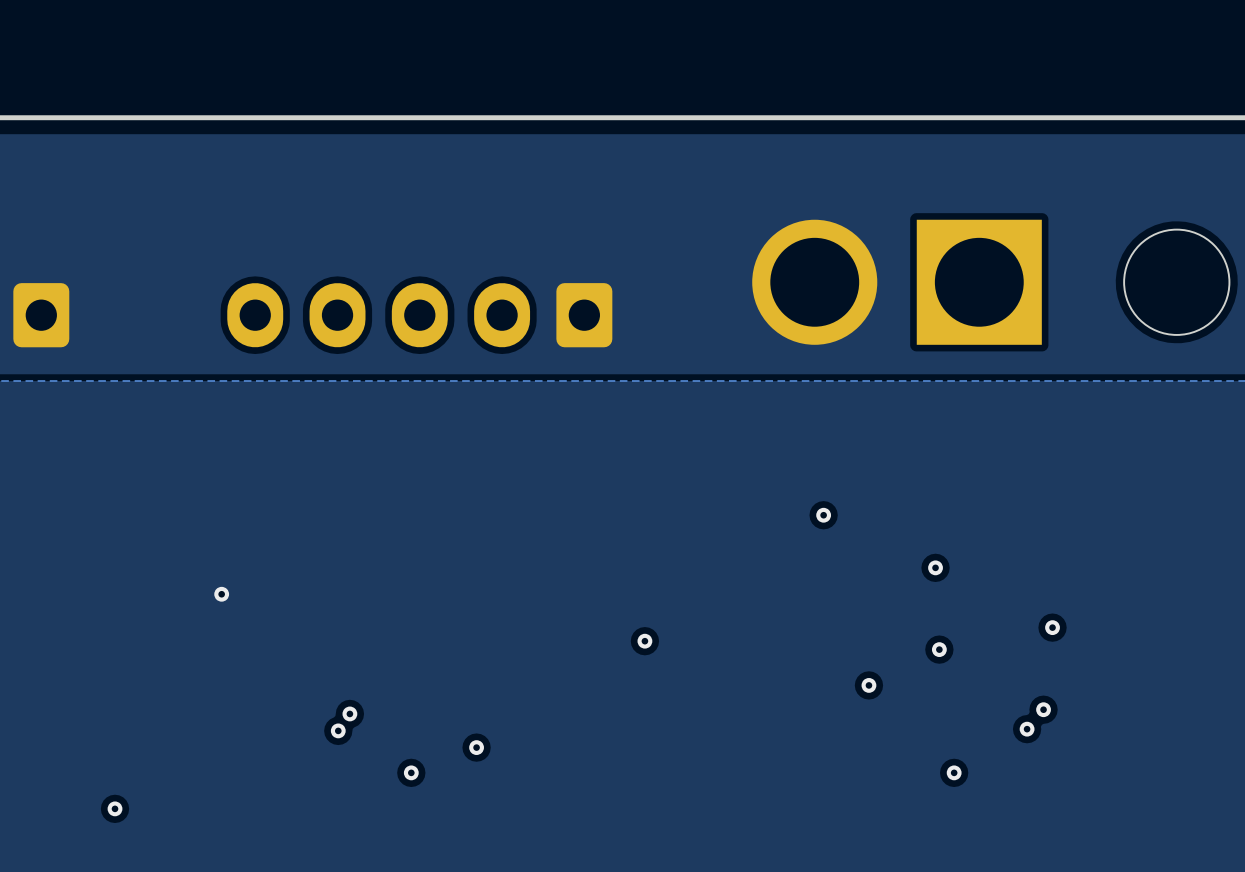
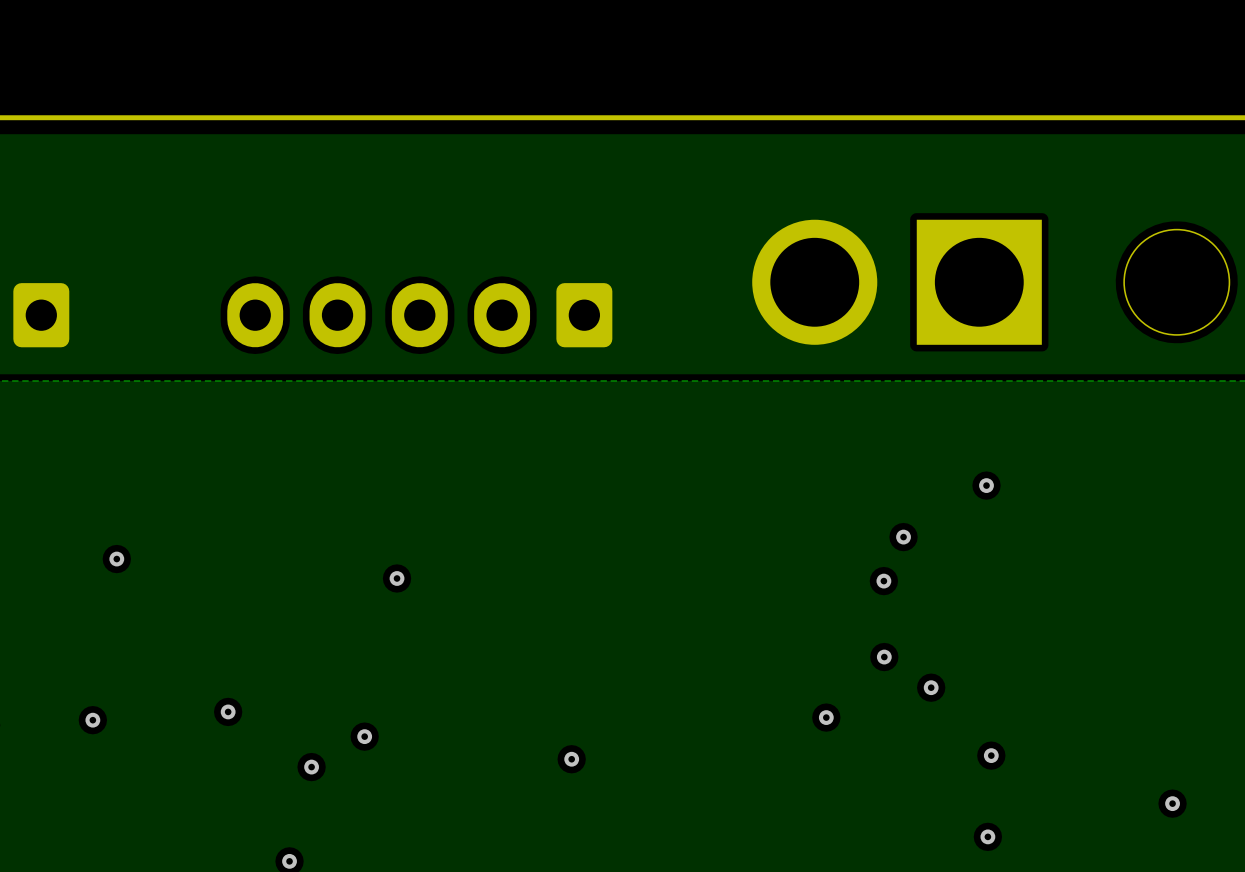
via: none -> (986, 485)
via: (823, 515) -> none
via: none -> (903, 537)
via: none -> (116, 559)
via: (935, 567) -> none
via: none -> (397, 578)
via: none -> (883, 581)
via: (221, 594) -> none
via: (1052, 627) -> none
via: (644, 641) -> none
via: (939, 649) -> none
via: none -> (884, 657)
via: (868, 685) -> none
via: none -> (931, 687)
via: (1043, 709) -> none
via: none -> (228, 711)
via: (349, 713) -> none
via: none -> (826, 717)
via: none -> (92, 720)
via: (1027, 729) -> none
via: (338, 730) -> none
via: none -> (364, 736)
via: (476, 747) -> none
via: none -> (991, 755)
via: none -> (571, 759)
via: none -> (311, 767)
via: (411, 772) -> none
via: (954, 772) -> none
via: none -> (1172, 803)
via: (115, 808) -> none
via: none -> (987, 836)
via: none -> (289, 861)

